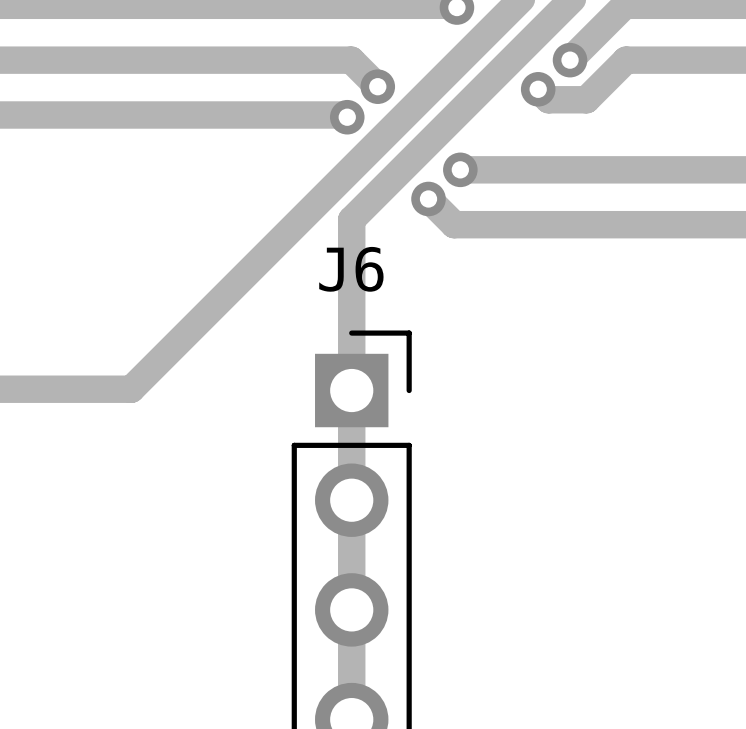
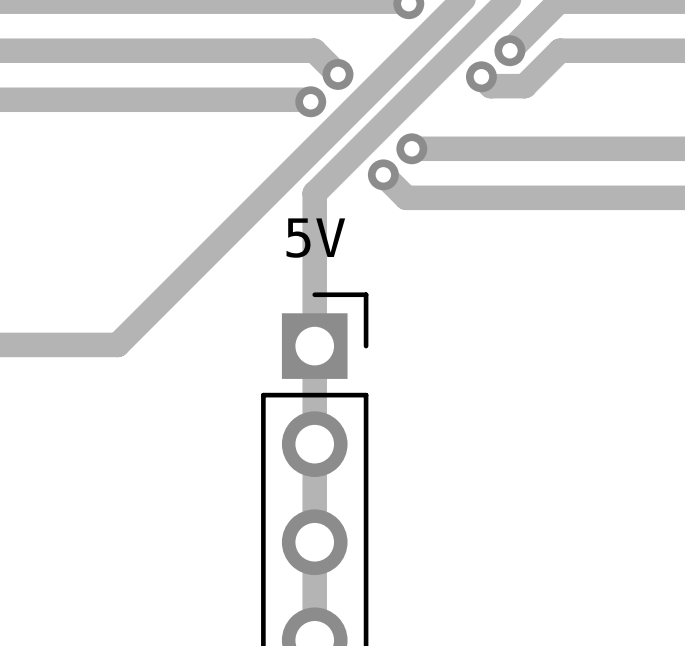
J6 name: J6 (351, 269) -> 5V (315, 238)

